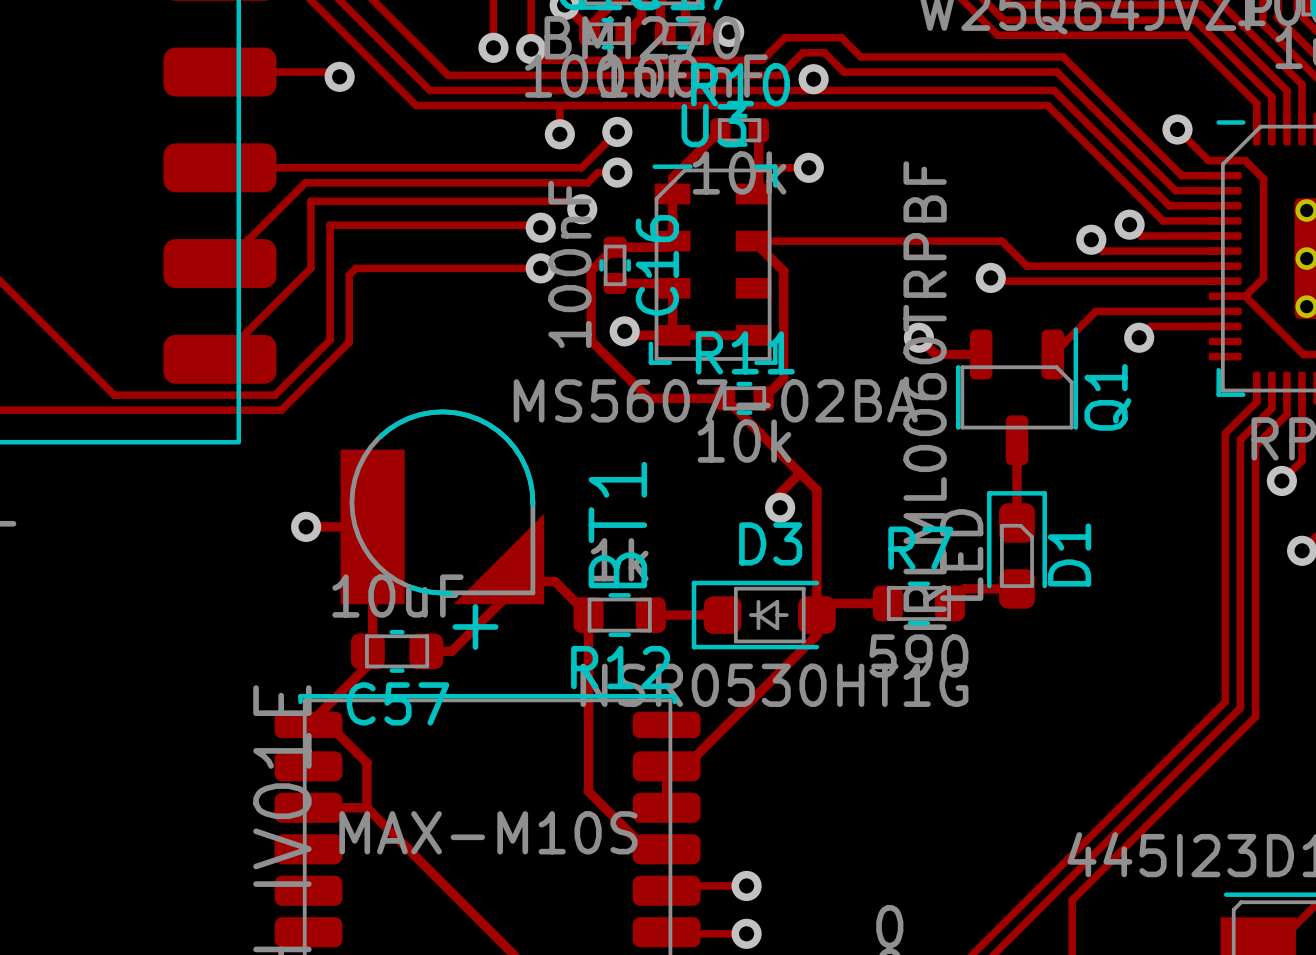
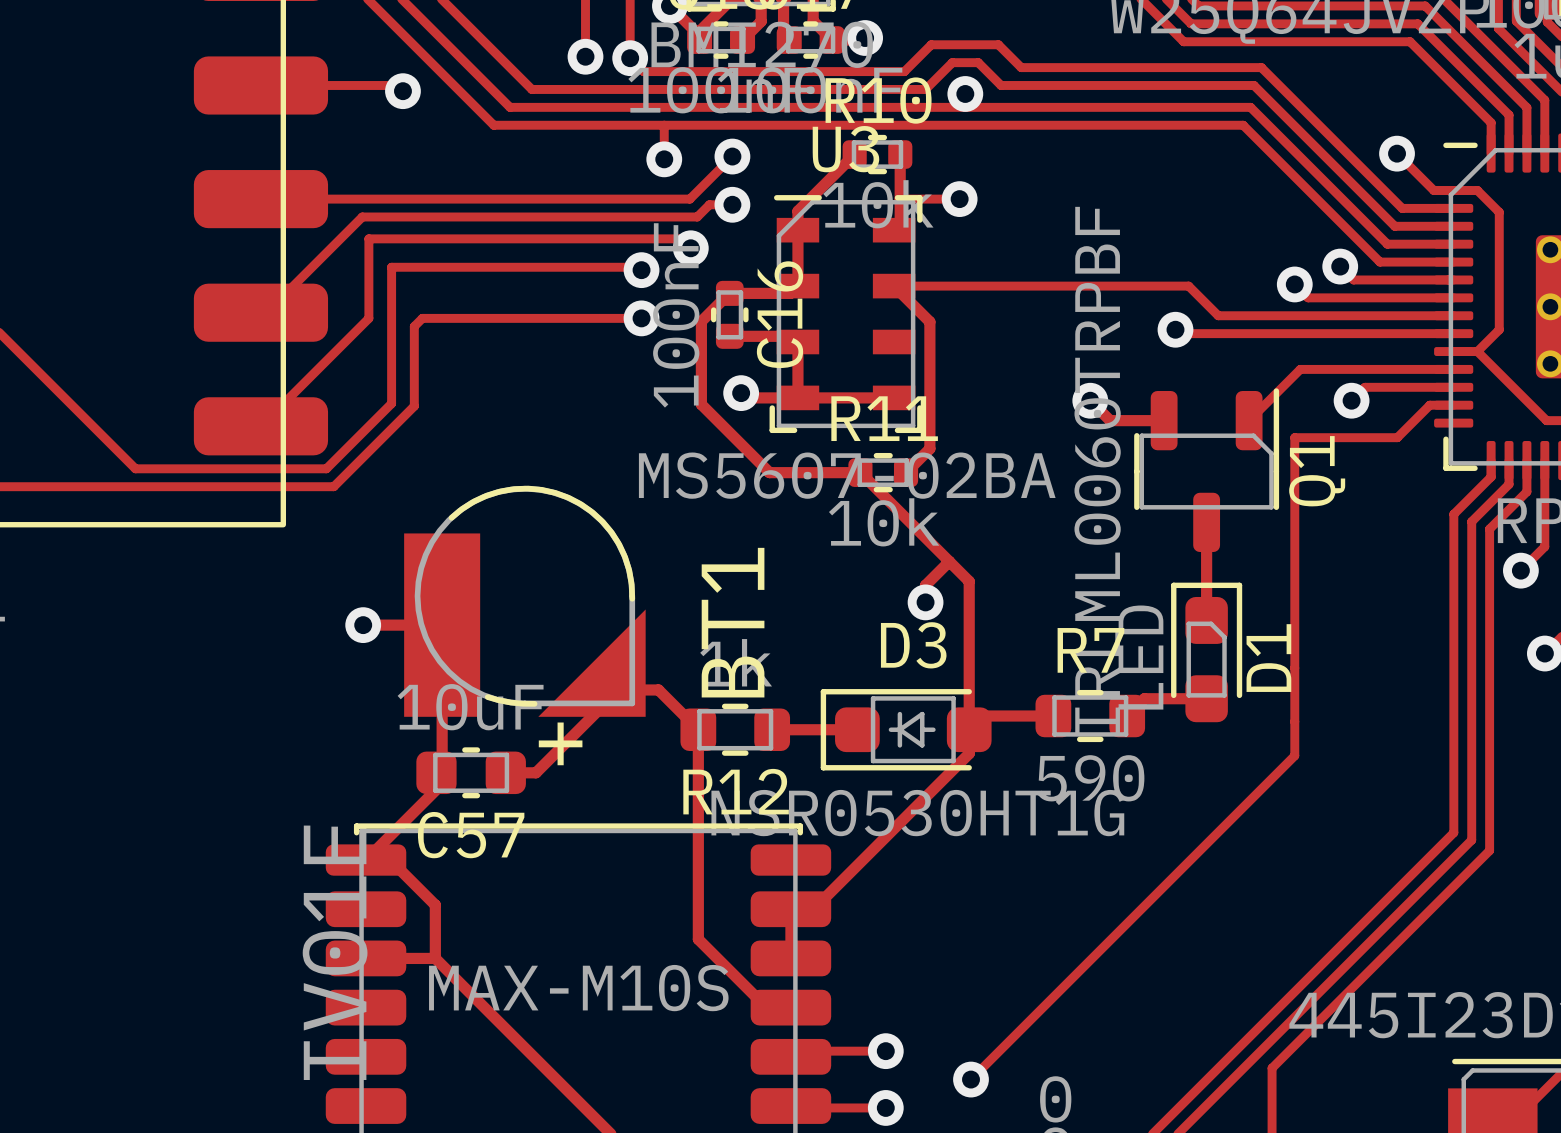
track: none -> (1453, 405) (1429, 405) (1397, 437) (1294, 437) (1294, 755) (971, 1079) (971, 1090)
via: none -> (971, 1079)

